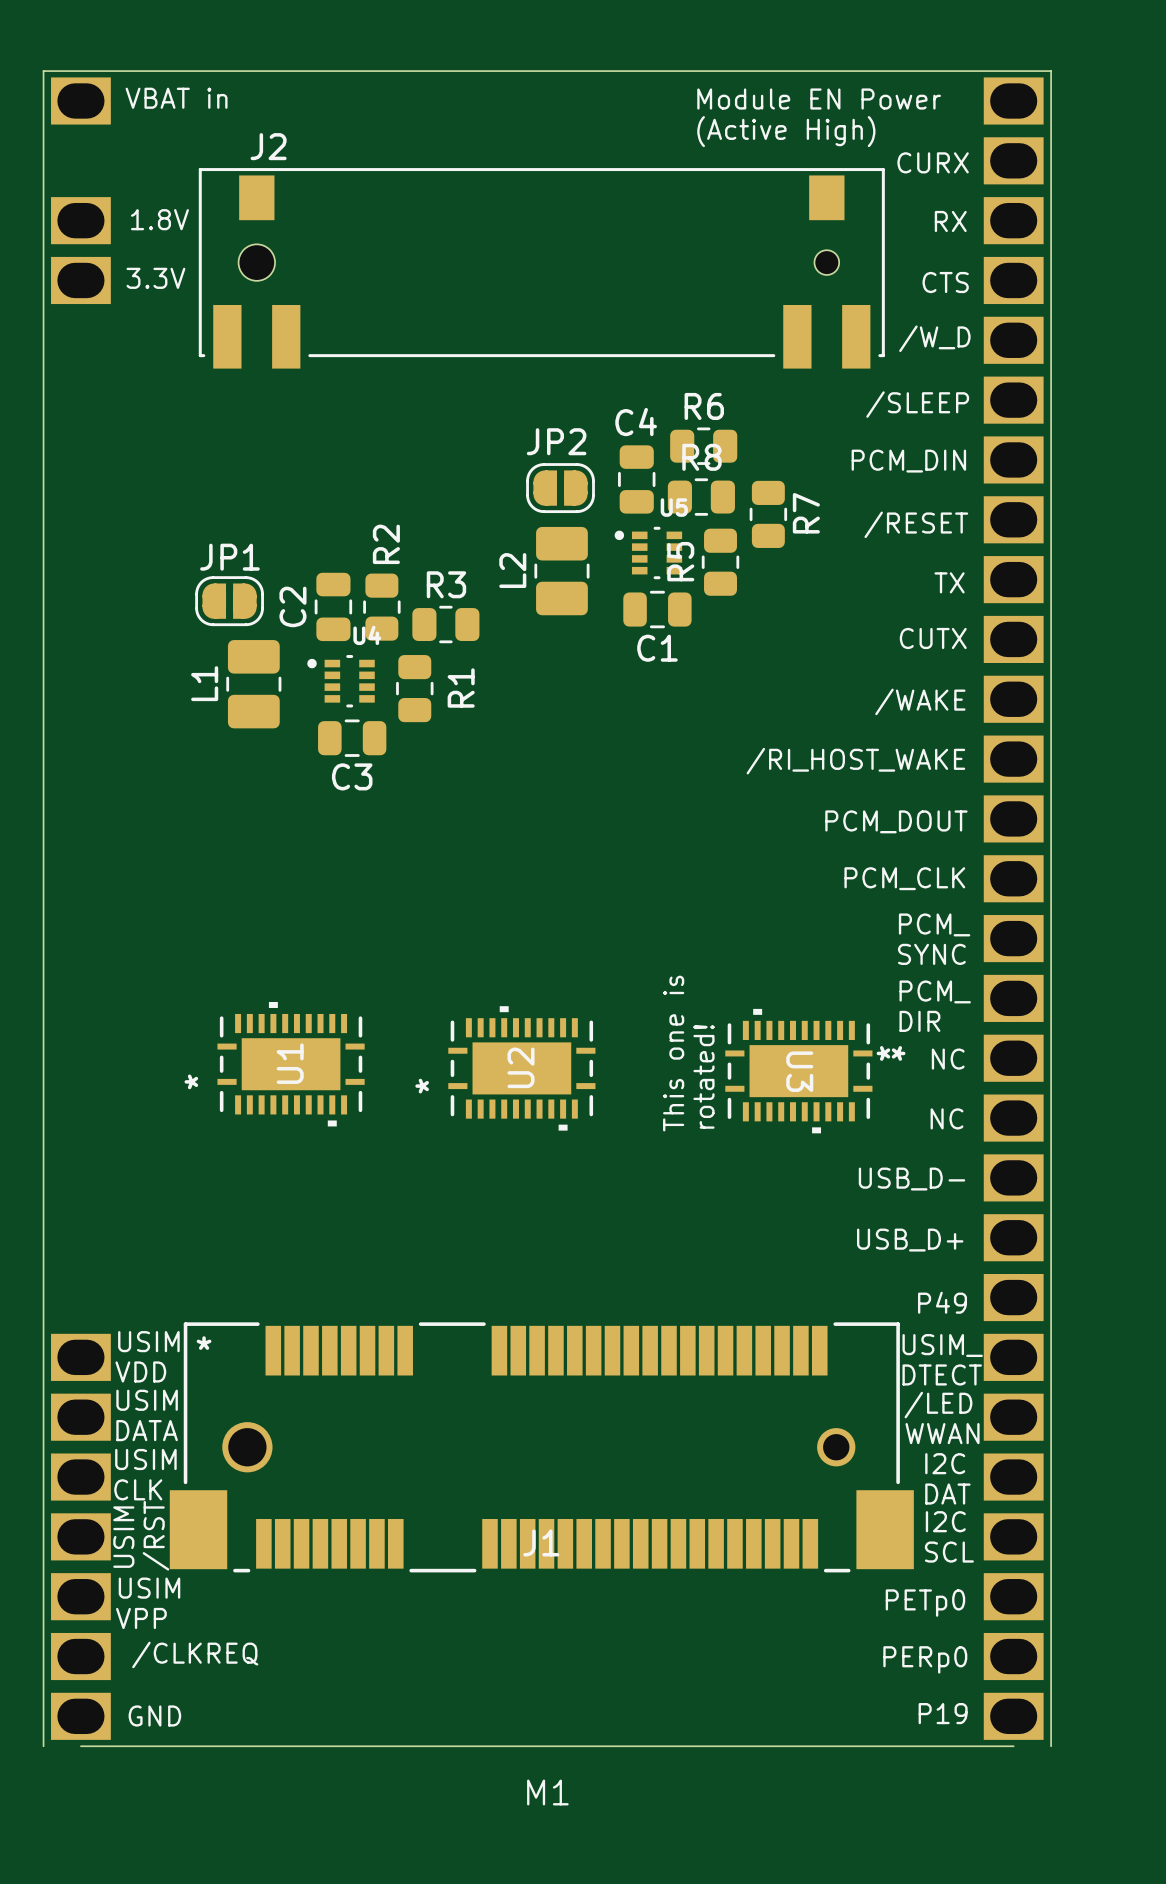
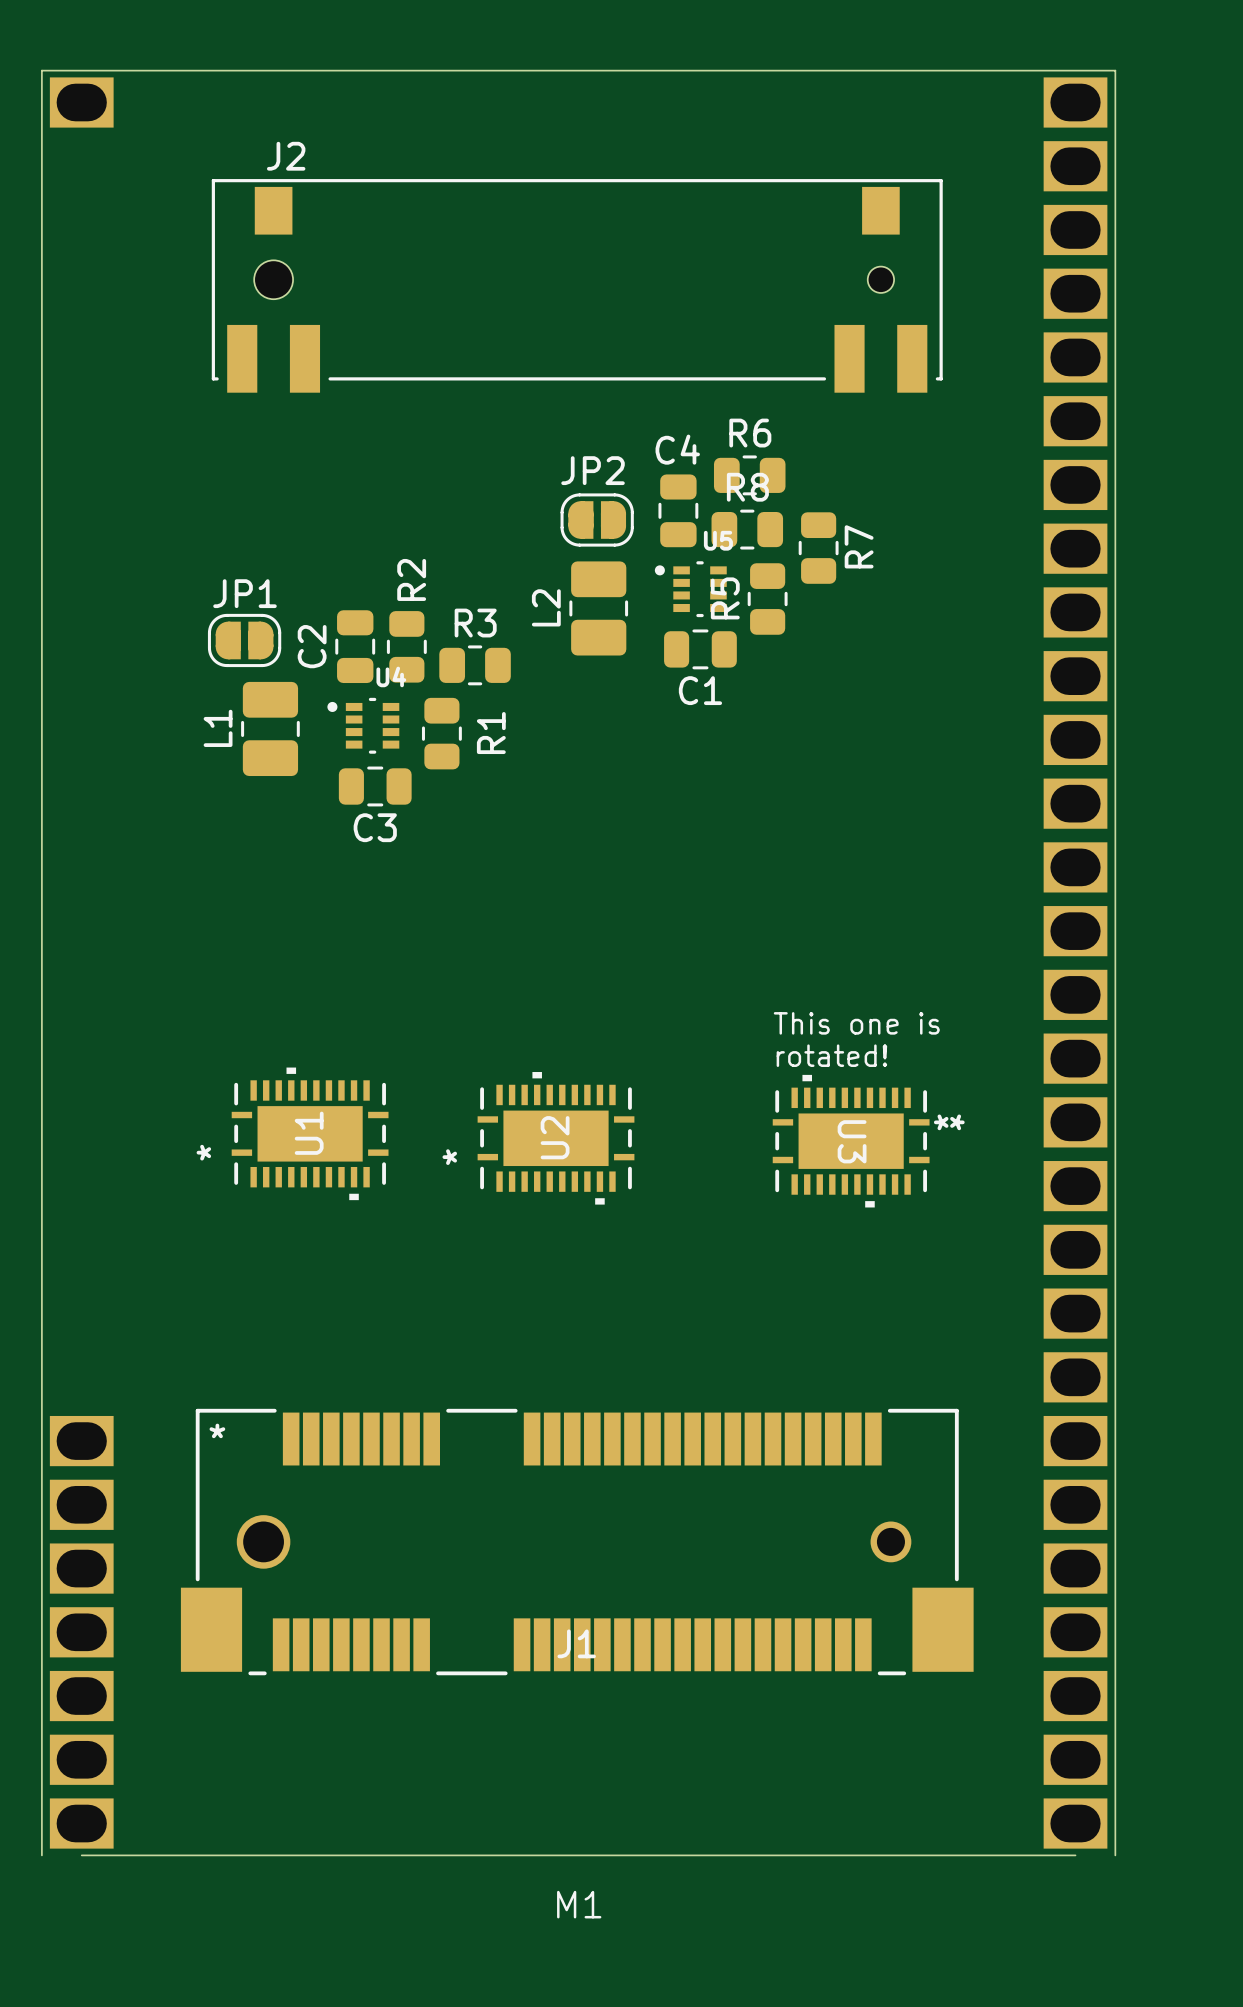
M1 footprint: [42, 70, 1052, 1747] -> [41, 70, 1116, 1857]
text: VBAT in (176, 98) -> none
text: Module EN Power (819, 99) -> none
text: (Active High) (786, 131) -> none
text: CURX (933, 162) -> none
text: 1.8V (159, 219) -> none
text: RX (950, 221) -> none
text: 3.3V (155, 278) -> none
text: CTS (945, 282) -> none
text: /W_D (934, 338) -> none
text: /SLEEP (917, 404) -> none
text: PCM_DIN (908, 461) -> none
text: /RESET (916, 524) -> none
text: TX (949, 582) -> none
text: CUTX (933, 638) -> none
text: /WAKE (920, 701) -> none
text: /RI_HOST_WAKE (855, 761) -> none
text: PCM_DOUT (896, 821) -> none
text: PCM_CLK (904, 878) -> none
text: PCM_ (934, 924) -> none
text: SYNC (931, 954) -> none
text: PCM_ (935, 991) -> none
text: DIR (919, 1021) -> none
text rotation: 0° (673, 1053) -> 90° clockwise (856, 1023)
text: NC (948, 1059) -> none
text rotation: 0° (703, 1076) -> 90° clockwise (831, 1055)
text: NC (947, 1118) -> none
text: USB_D- (912, 1179) -> none
text: USB_D+ (910, 1240) -> none
text: P49 (942, 1302) -> none
text: USIM (148, 1341) -> none
text: USIM_ (942, 1345) -> none
text: VDD (140, 1371) -> none
text: DTECT (942, 1374) -> none
text: USIM (147, 1400) -> none
text: /LED (938, 1405) -> none
text: DATA (147, 1430) -> none
text: WWAN (942, 1433) -> none
text: USIM (145, 1459) -> none
text: I2C (945, 1463) -> none
text: CLK (138, 1489) -> none
text: DAT (947, 1494) -> none
text: I2C (945, 1521) -> none
text: /RST (155, 1535) -> none
text: USIM (123, 1537) -> none
text: SCL (949, 1552) -> none
text: USIM (149, 1588) -> none
text: PETp0 (925, 1603) -> none
text: VPP (141, 1618) -> none
text: /CLKREQ (195, 1654) -> none
text: PERp0 (925, 1659) -> none
text: P19 (943, 1713) -> none
text: GND (154, 1715) -> none

